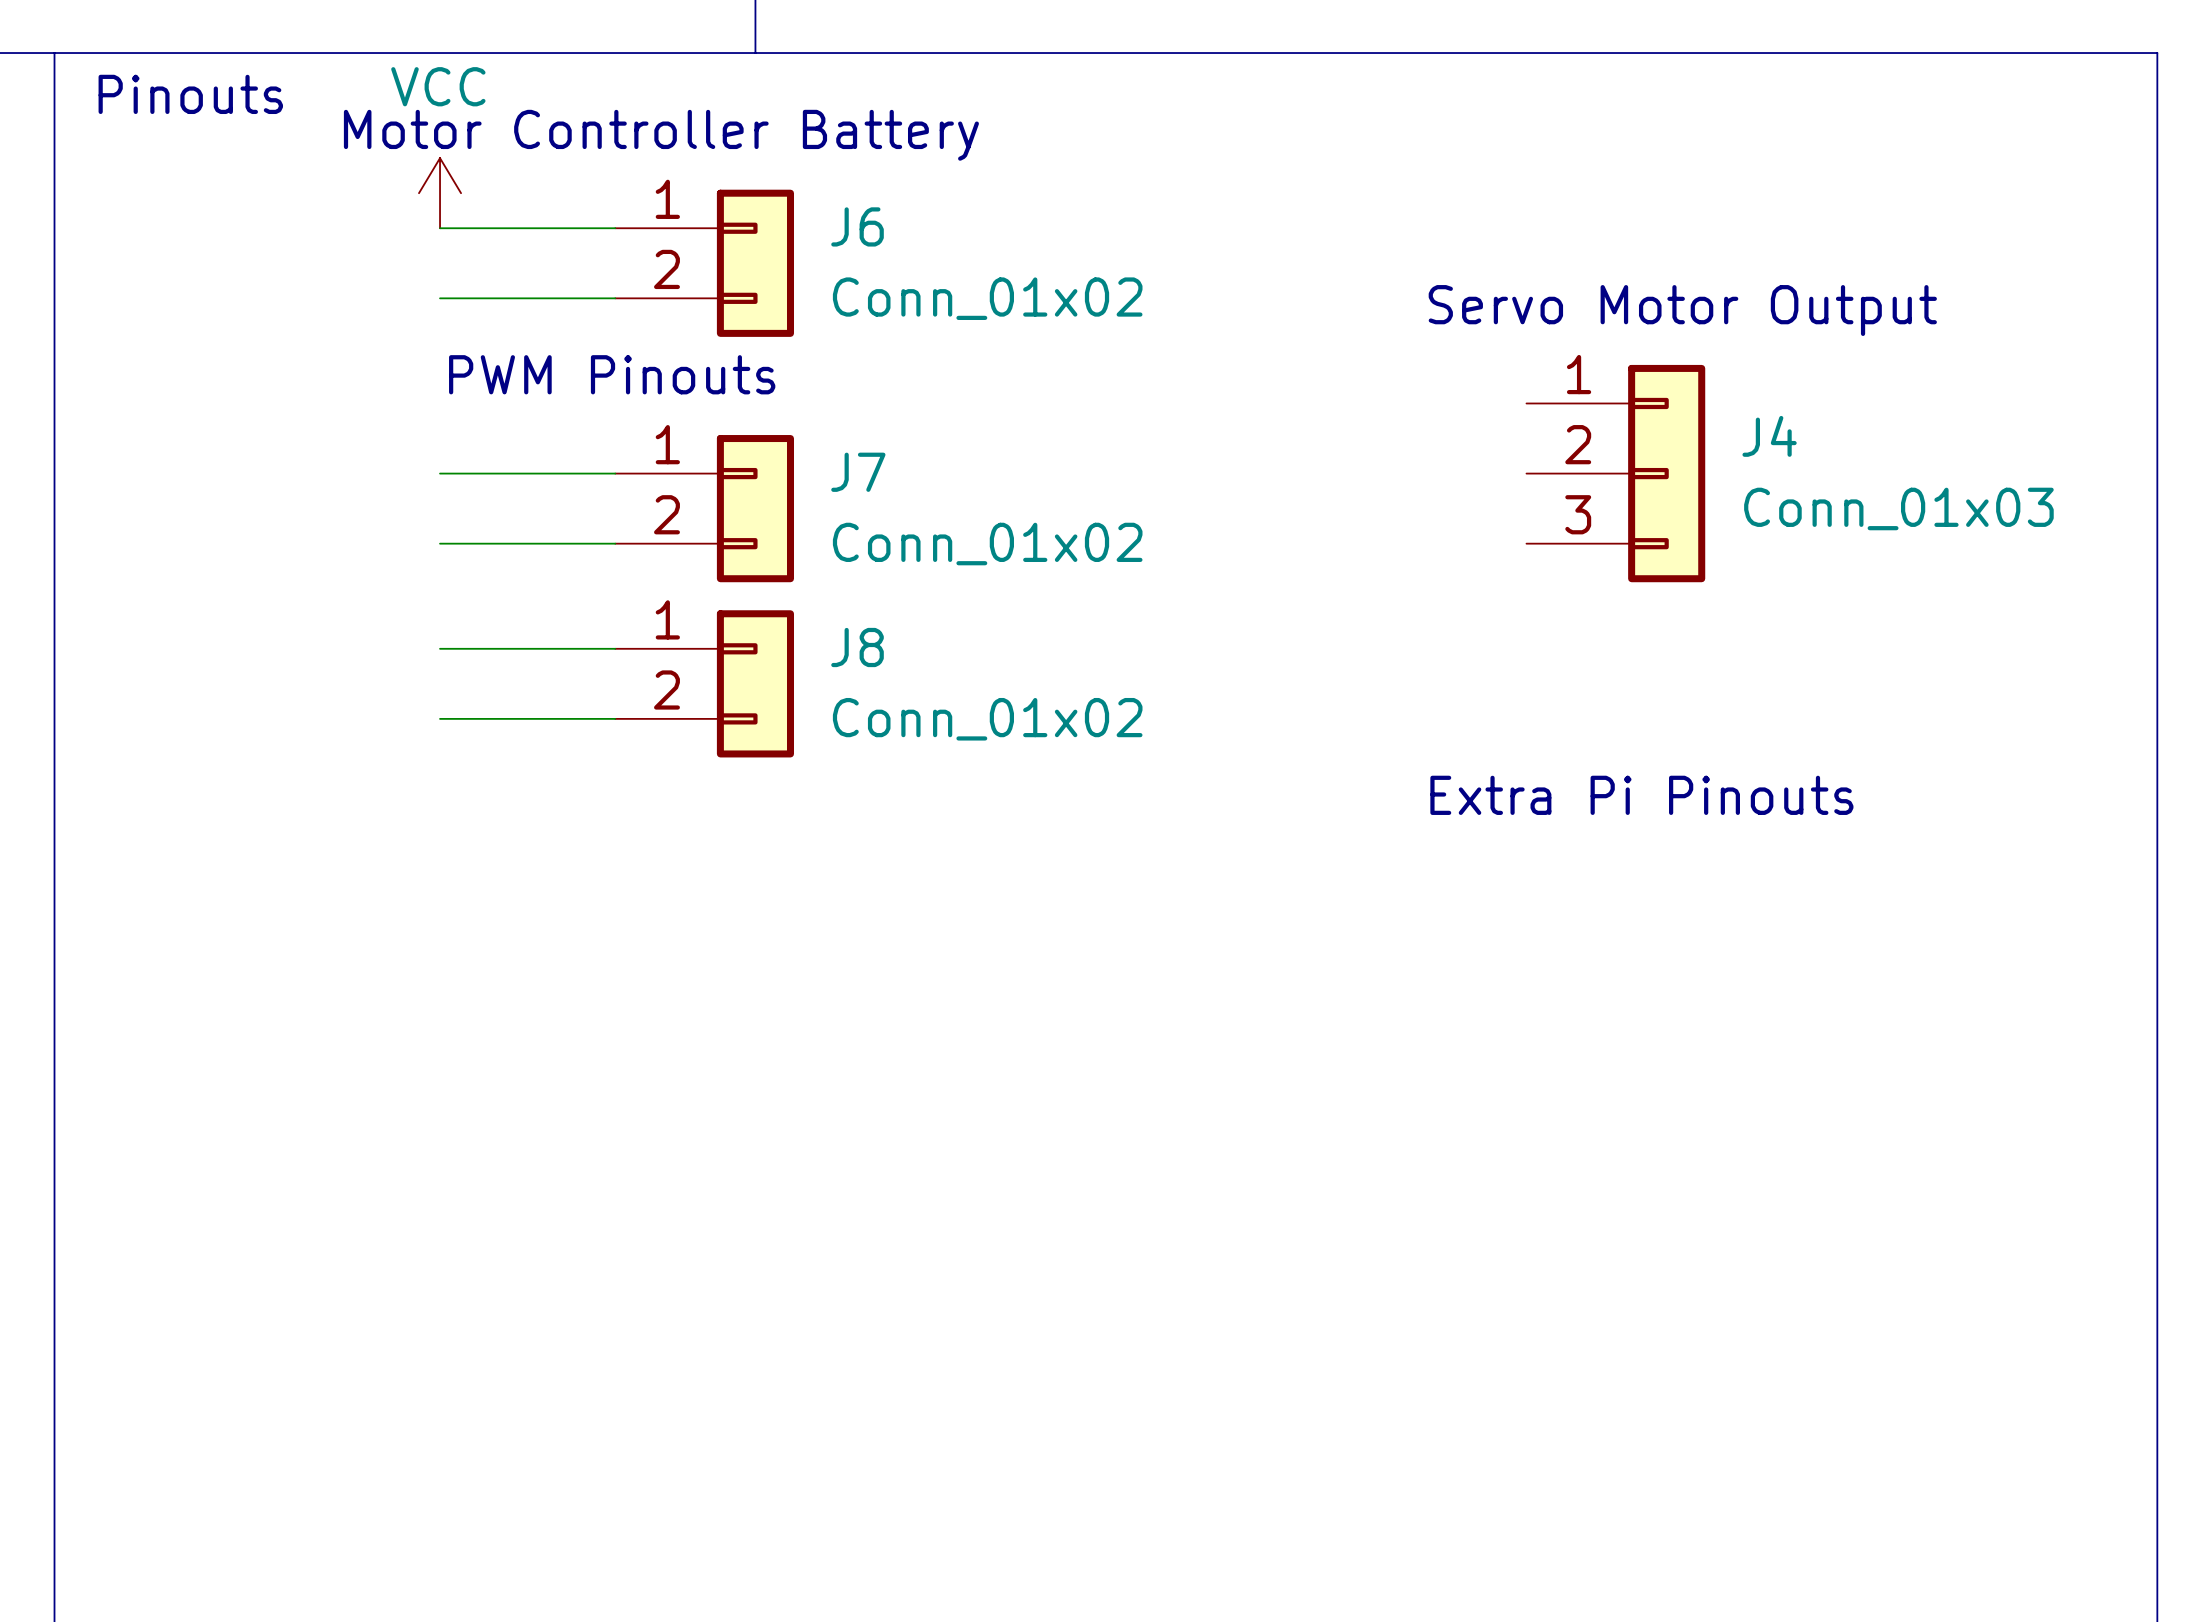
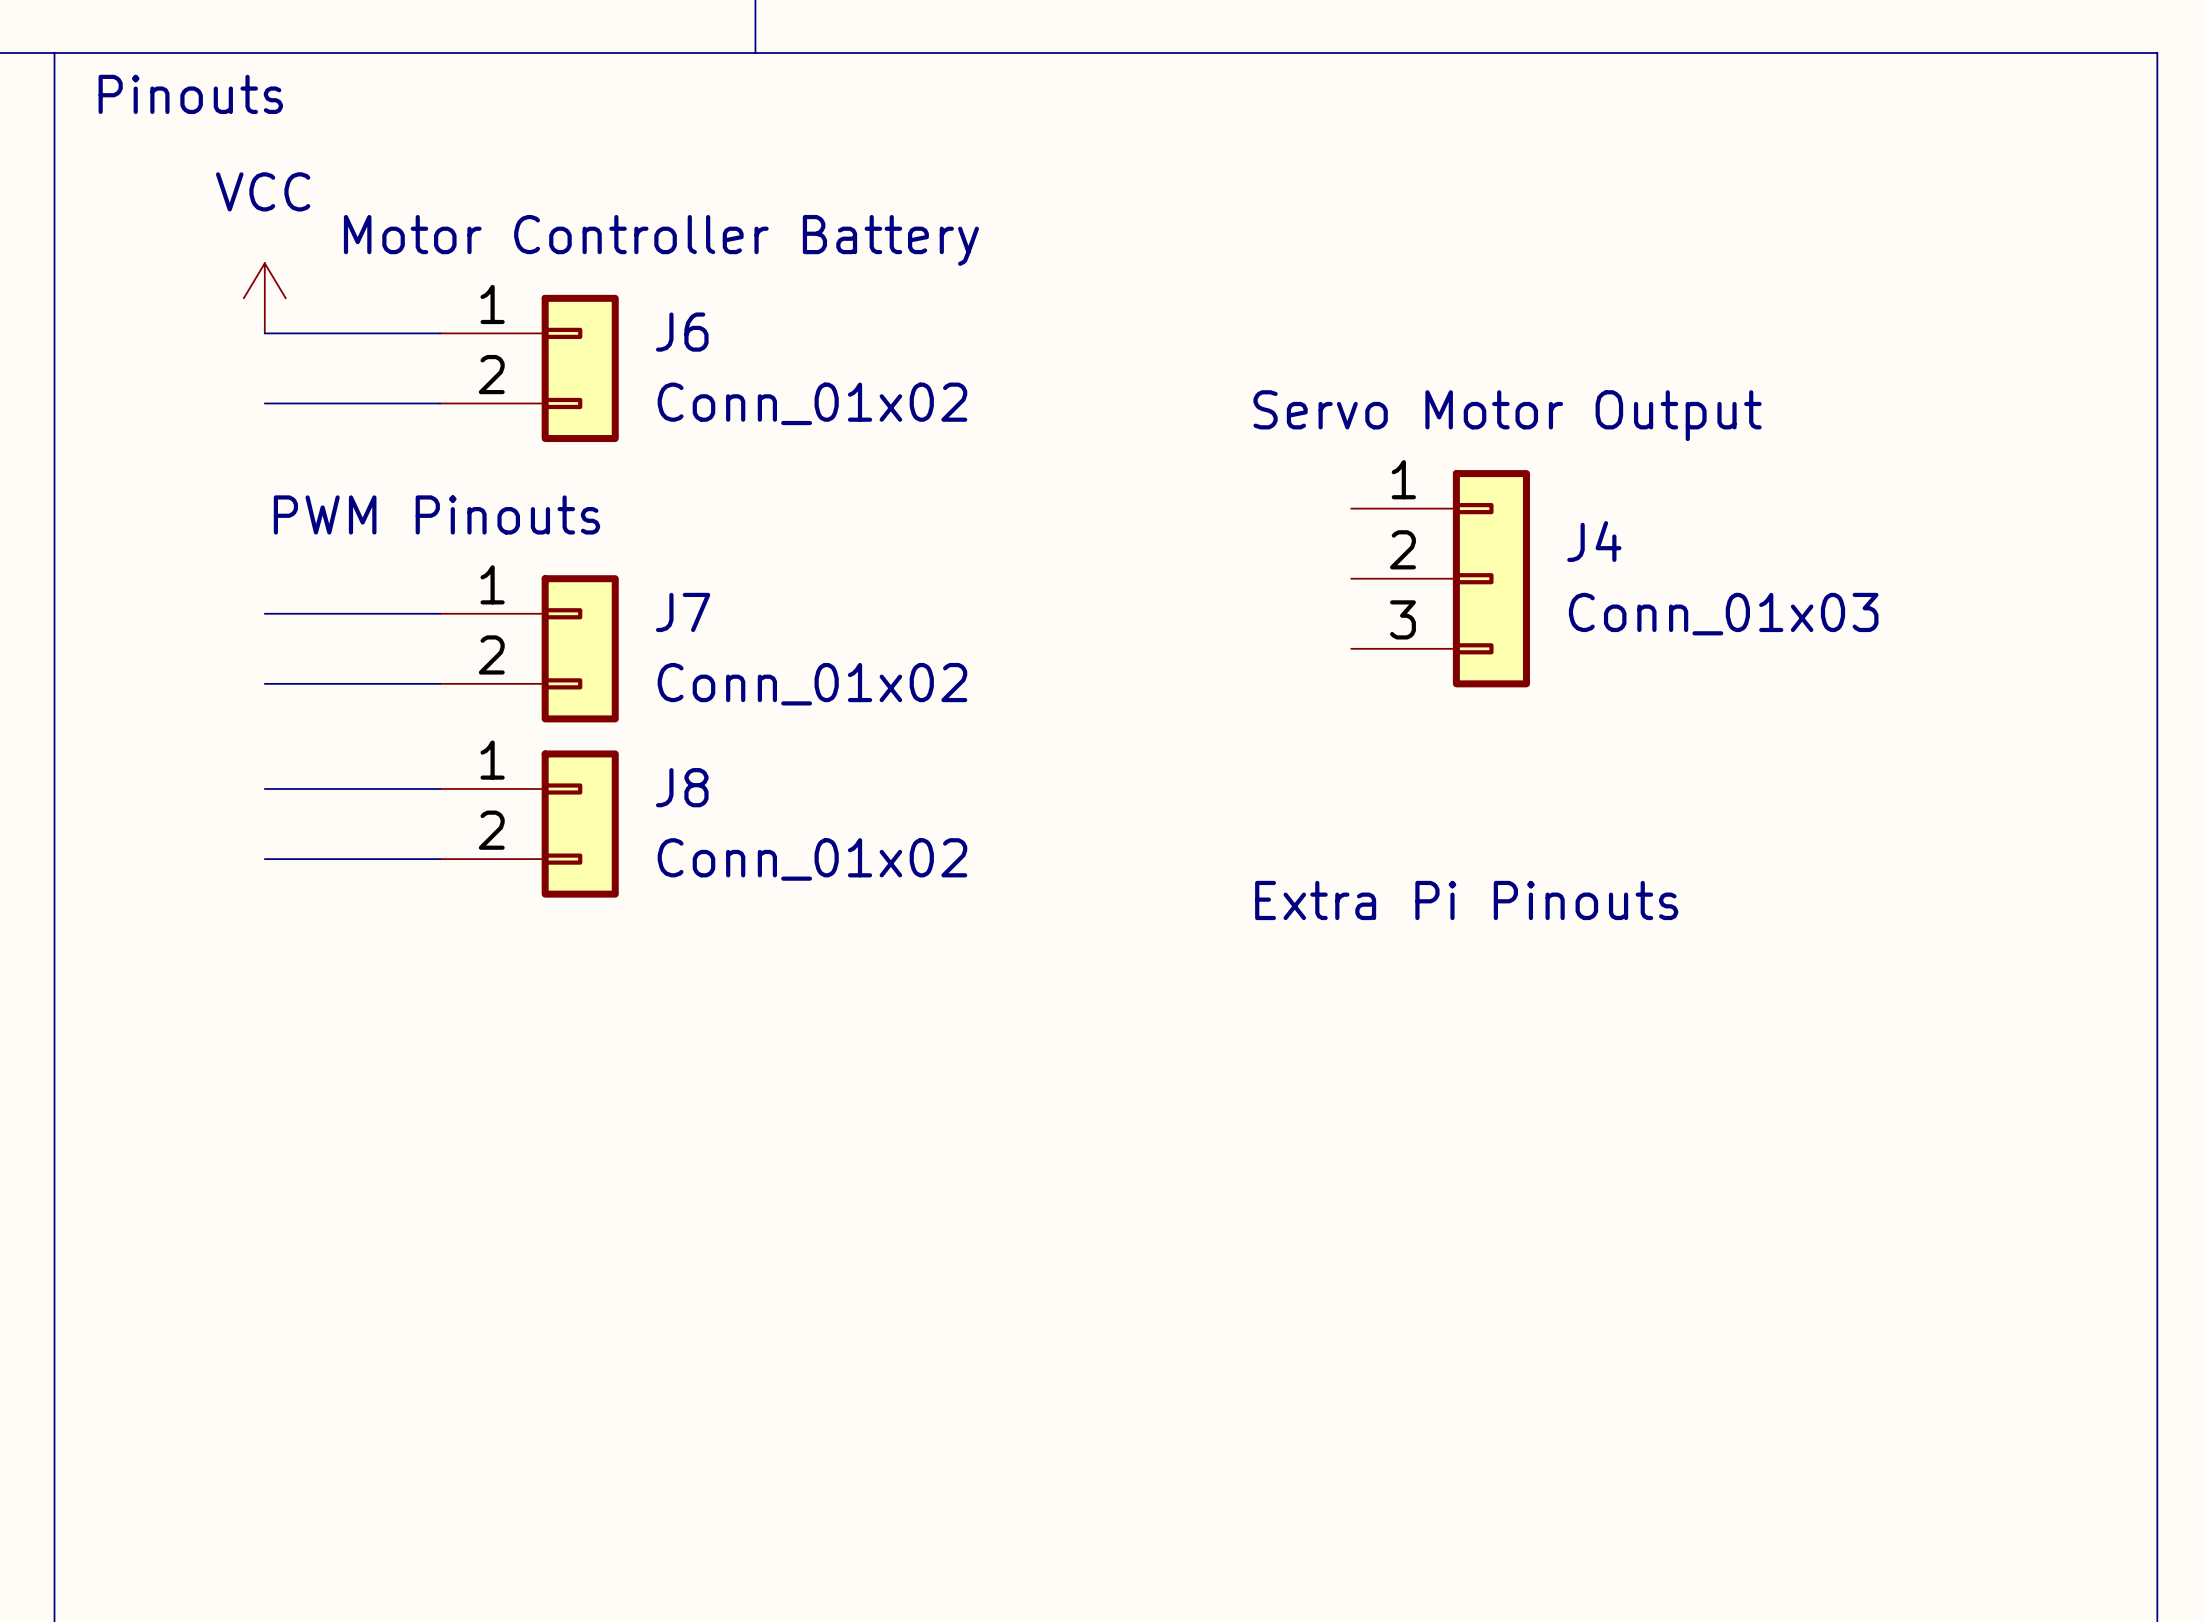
text position: Motor Controller Battery (661, 135) -> Motor Controller Battery (661, 240)
power symbol position: VCC (440, 193) -> VCC (264, 298)
wire: (440, 228) (615, 228) -> (264, 403) (440, 403)
J6 position: (704, 263) -> (529, 368)
wire: (440, 298) (615, 298) -> (264, 333) (440, 333)
text position: Servo Motor Output (1682, 310) -> Servo Motor Output (1507, 415)
text position: PWM Pinouts (612, 374) -> PWM Pinouts (436, 514)
wire: (440, 473) (615, 473) -> (264, 613) (440, 613)
J4 position: (1615, 473) -> (1440, 578)
J7 position: (704, 508) -> (529, 648)
wire: (440, 543) (615, 543) -> (264, 683) (440, 683)
wire: (440, 648) (615, 648) -> (264, 789) (440, 789)
J8 position: (704, 683) -> (529, 824)
wire: (440, 718) (615, 718) -> (264, 859) (440, 859)
text position: Extra Pi Pinouts (1641, 795) -> Extra Pi Pinouts (1466, 900)

